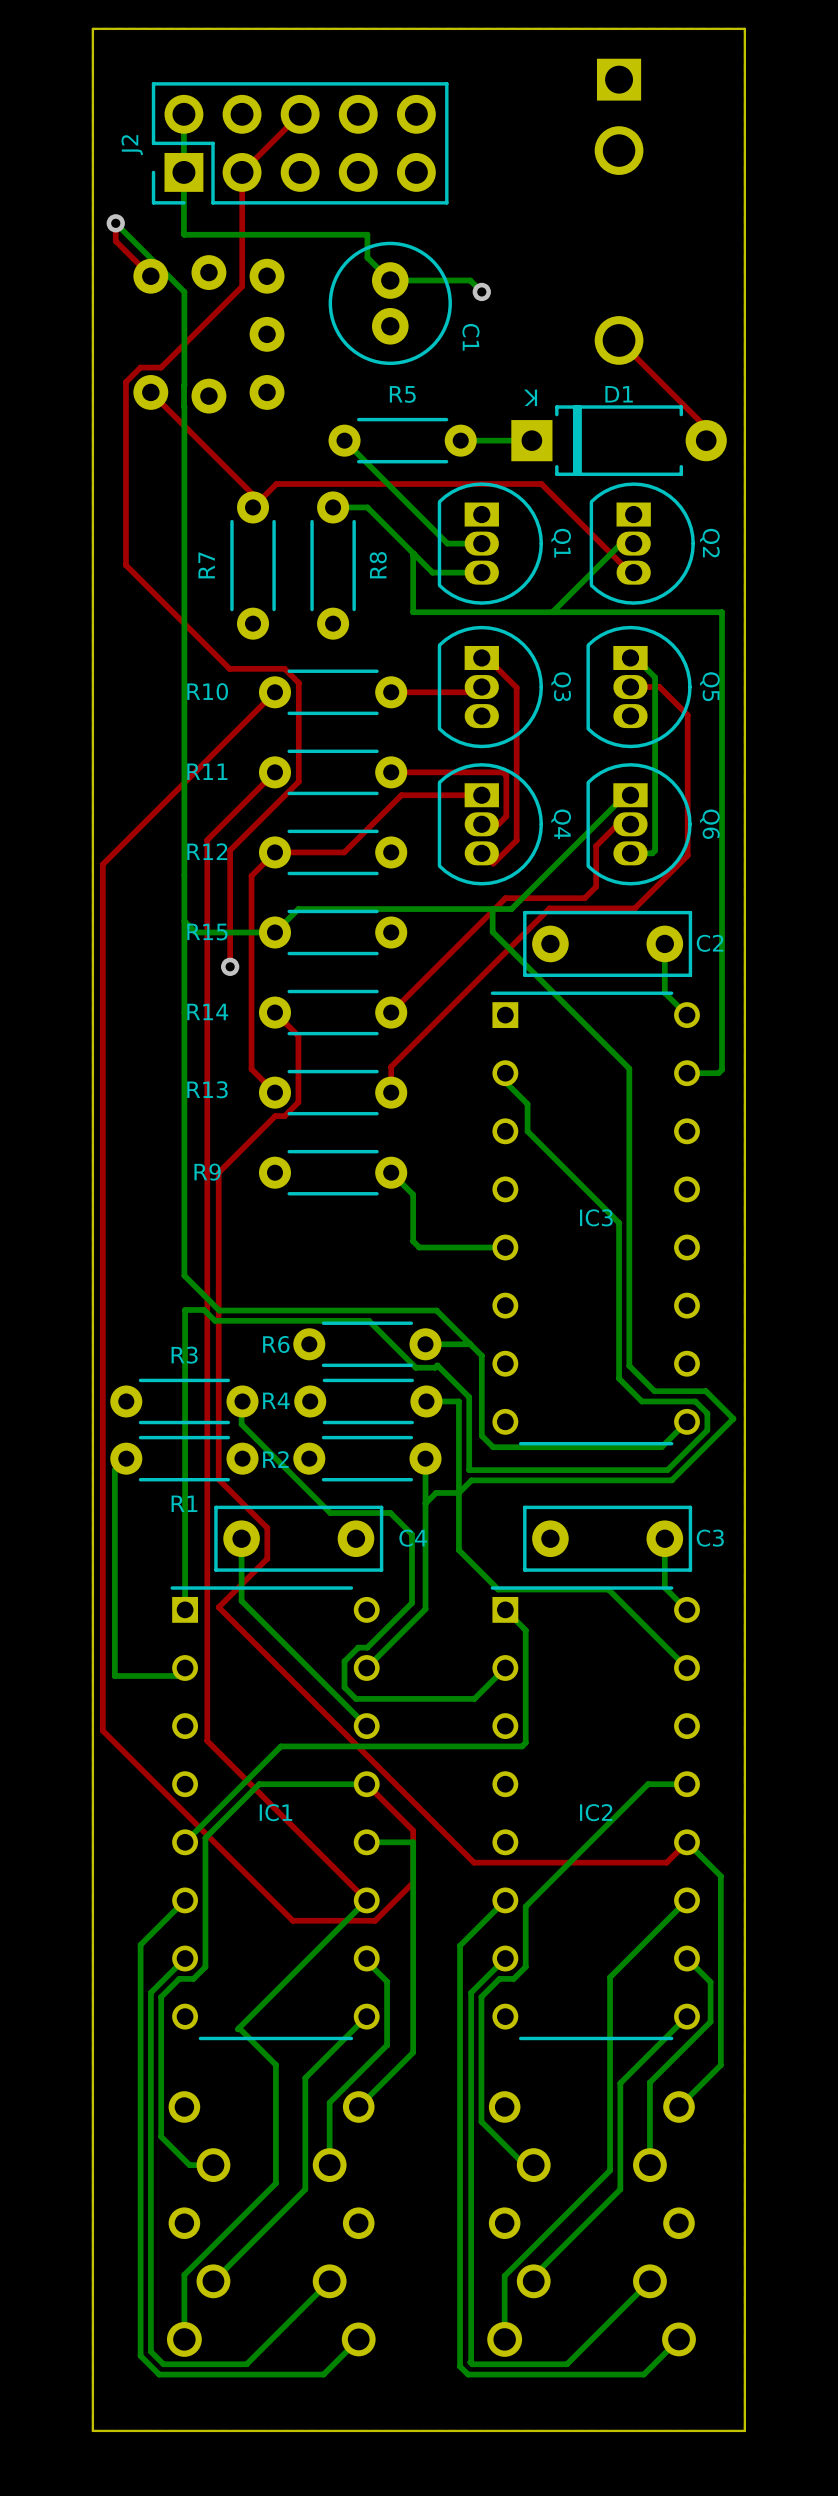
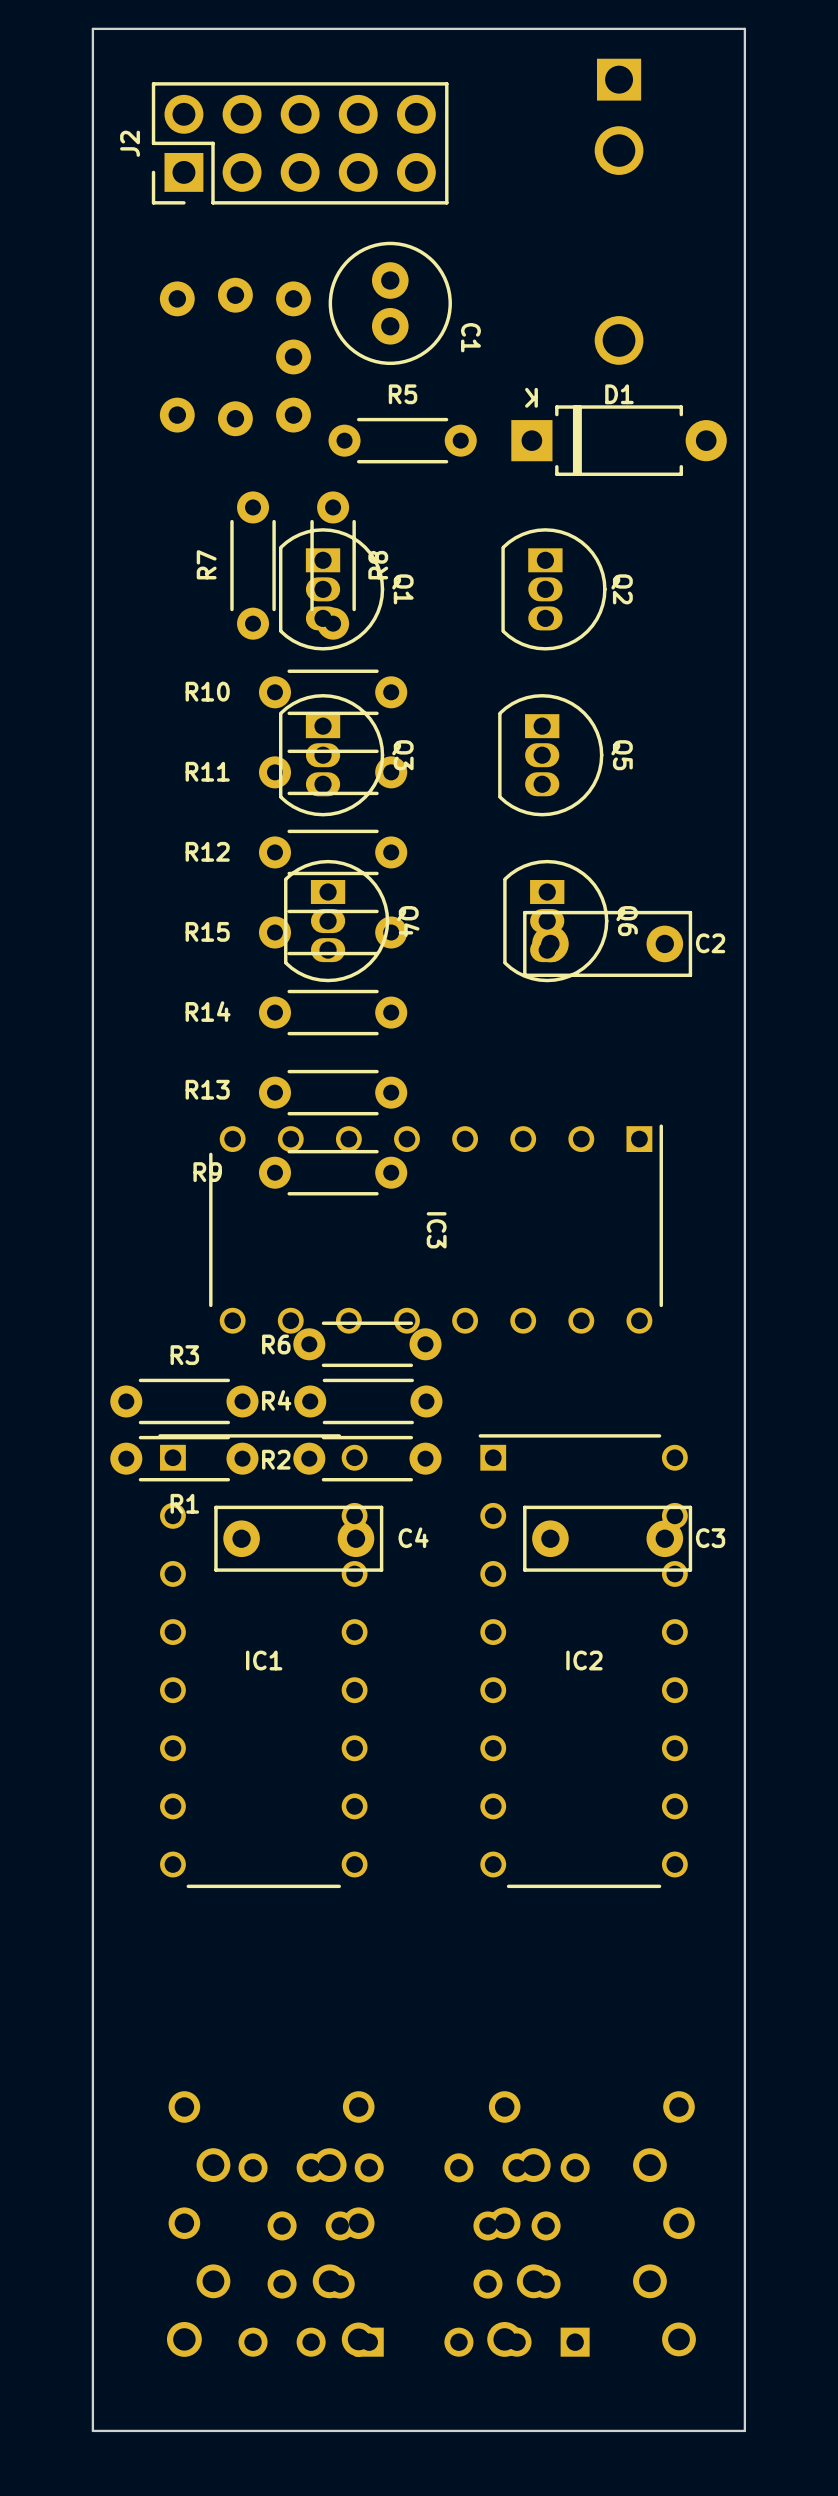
bottom track: (183, 114) (184, 234) (367, 234) (367, 257) (390, 280) (470, 280) (481, 291) -> none
top track: (300, 114) (242, 172) (242, 286) (161, 367) (140, 367) (125, 382) (125, 565) (229, 668) (284, 668) (298, 682) (298, 781) (230, 850) (230, 966) -> none
top track: (115, 223) (115, 241) (150, 276) -> none
bottom track: (115, 223) (184, 291) (184, 385) -> none
via: (115, 223) -> none
via: (481, 291) -> none
part position: (208, 334) -> (235, 356)
top track: (619, 340) (706, 427) (706, 440) -> none
bottom track: (184, 385) (184, 406) -> none
top track: (150, 392) (253, 494) (253, 507) (276, 484) (541, 484) (630, 572) (633, 572) -> none
bottom track: (184, 406) (184, 1275) (219, 1310) (436, 1310) (481, 1355) (481, 1435) (493, 1447) (661, 1447) (687, 1421) -> none
bottom track: (344, 440) (447, 543) (481, 543) -> none
bottom track: (531, 440) (460, 440) -> none
bottom track: (333, 507) (367, 507) (432, 572) (481, 572) -> none
Q1 position: (490, 543) -> (331, 589)
bottom track: (633, 543) (621, 543) (552, 612) -> none
Q2 position: (642, 543) -> (553, 589)
bottom track: (414, 554) (413, 612) (722, 612) (722, 1069) (718, 1073) (687, 1073) -> none
top track: (481, 657) (486, 657) (516, 687) (516, 840) (493, 863) -> none
bottom track: (630, 657) (635, 657) (655, 677) (655, 850) (652, 853) (630, 853) -> none
top track: (481, 687) (476, 692) (391, 692) -> none
Q3 position: (490, 687) -> (331, 755)
top track: (630, 687) (659, 687) (687, 715) (687, 855) (634, 908) (549, 908) (391, 1066) (391, 1092) -> none
Q5 position: (639, 687) -> (550, 755)
top track: (274, 692) (102, 864) (102, 1730) (292, 1920) (375, 1920) (413, 1882) (413, 1830) (366, 1784) -> none
top track: (274, 772) (207, 840) (207, 1740) (366, 1900) -> none
top track: (391, 772) (502, 772) (506, 775) (506, 816) (498, 824) (481, 824) -> none
top track: (481, 795) (401, 795) (344, 852) (274, 852) (251, 875) (251, 1069) (274, 1092) -> none
bottom track: (630, 795) (625, 795) (511, 909) (298, 909) (274, 932) (195, 932) (184, 921) -> none
Q4 position: (490, 824) -> (336, 921)
top track: (630, 824) (617, 824) (596, 846) (596, 886) (584, 898) (505, 898) (391, 1012) -> none
Q6 position: (639, 824) -> (555, 921)
bottom track: (492, 909) (492, 931) (629, 1068) (629, 1366) (654, 1391) (705, 1391) (733, 1418) (671, 1480) (471, 1480) (458, 1492) (436, 1492) (425, 1503) -> none
bottom track: (664, 943) (664, 992) (687, 1015) -> none
via: (230, 966) -> none
top track: (274, 1012) (298, 1036) (298, 1102) (284, 1116) (275, 1116) (218, 1172) (218, 1479) (267, 1528) (267, 1558) (218, 1607) (474, 1862) (666, 1862) (687, 1842) -> none
bottom track: (505, 1073) (504, 1081) (527, 1104) (527, 1131) (619, 1222) (619, 1378) (641, 1401) (695, 1401) (707, 1413) (707, 1430) (667, 1470) (469, 1470) (469, 1397) (437, 1365) (435, 1367) (415, 1367) (368, 1320) (215, 1320) (204, 1309) (185, 1309) (185, 1609) -> none
bottom track: (391, 1172) (413, 1194) (413, 1241) (419, 1247) (505, 1247) -> none
IC3 rotation: 0° (595, 1218) -> 90° clockwise (436, 1229)
bottom track: (470, 1344) (425, 1344) -> none
bottom track: (242, 1401) (241, 1424) (330, 1513) (390, 1513) (412, 1534) (412, 1603) (367, 1647) (358, 1647) (344, 1661) (344, 1687) (355, 1698) (474, 1698) (505, 1667) -> none
bottom track: (426, 1401) (458, 1401) (458, 1550) (498, 1589) (608, 1589) (687, 1667) -> none
bottom track: (126, 1458) (114, 1470) (114, 1675) (177, 1675) (185, 1667) -> none
bottom track: (425, 1458) (425, 1609) (366, 1667) -> none
bottom track: (241, 1538) (241, 1600) (366, 1726) -> none
bottom track: (664, 1538) (664, 1587) (687, 1609) -> none
bottom track: (505, 1609) (525, 1630) (525, 1742) (522, 1746) (280, 1746) (185, 1842) -> none
bottom track: (366, 1784) (259, 1784) (205, 1837) (205, 1966) (193, 1978) (179, 1978) (161, 1996) (161, 2136) (189, 2165) (213, 2165) -> none
bottom track: (687, 1784) (648, 1784) (525, 1906) (525, 1966) (513, 1978) (499, 1978) (481, 1996) (481, 2121) (524, 2165) (533, 2165) -> none
IC1 position: (275, 1813) -> (262, 1661)
IC2 position: (595, 1813) -> (583, 1661)
bottom track: (366, 1842) (413, 1842) (413, 2052) (358, 2106) -> none
bottom track: (687, 1842) (720, 1876) (720, 2065) (678, 2106) -> none
bottom track: (185, 1900) (140, 1944) (140, 2355) (159, 2374) (323, 2374) (358, 2339) -> none
bottom track: (366, 1900) (237, 2029) -> none
bottom track: (505, 1900) (460, 1945) (460, 2366) (468, 2374) (643, 2374) (678, 2339) -> none
bottom track: (687, 1900) (610, 1977) (610, 2170) (504, 2275) (504, 2339) -> none
bottom track: (185, 1958) (150, 1992) (150, 2351) (163, 2364) (246, 2364) (329, 2281) -> none
bottom track: (366, 1958) (366, 1961) (387, 1981) (387, 2045) (329, 2102) (329, 2165) -> none
bottom track: (505, 1958) (471, 1992) (470, 2362) (472, 2364) (566, 2364) (649, 2281) -> none
bottom track: (687, 1958) (710, 1982) (710, 2021) (649, 2082) (649, 2165) -> none
bottom track: (366, 2016) (305, 2078) (305, 2189) (213, 2281) -> none
bottom track: (687, 2016) (620, 2083) (620, 2189) (533, 2276) (533, 2281) -> none
bottom track: (239, 2028) (275, 2064) (275, 2183) (184, 2274) (184, 2339) -> none
part: none -> (311, 2255)
part: none -> (517, 2255)

